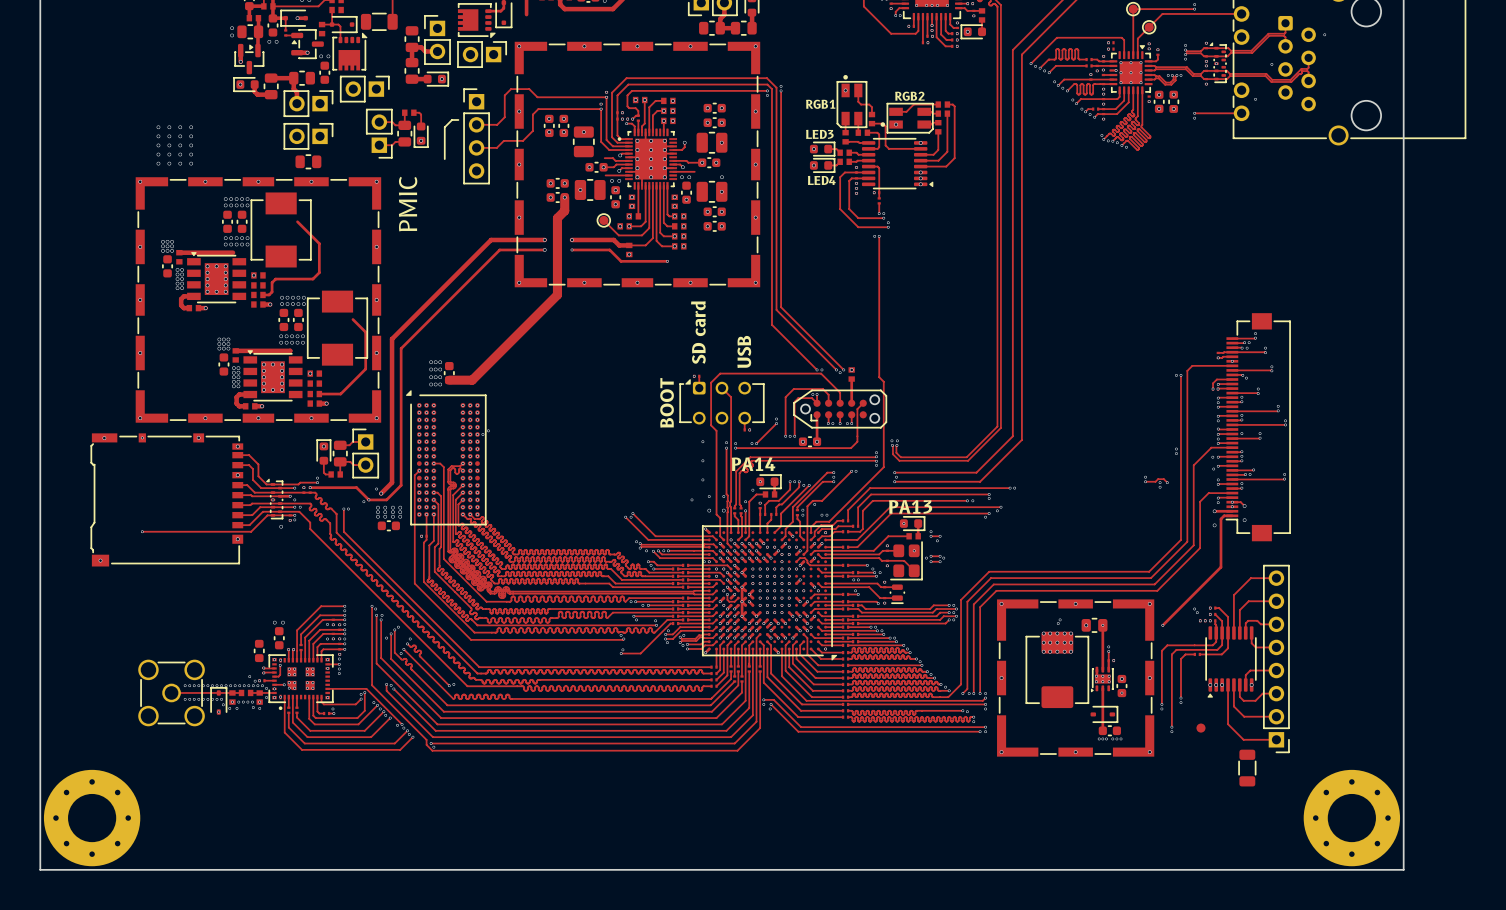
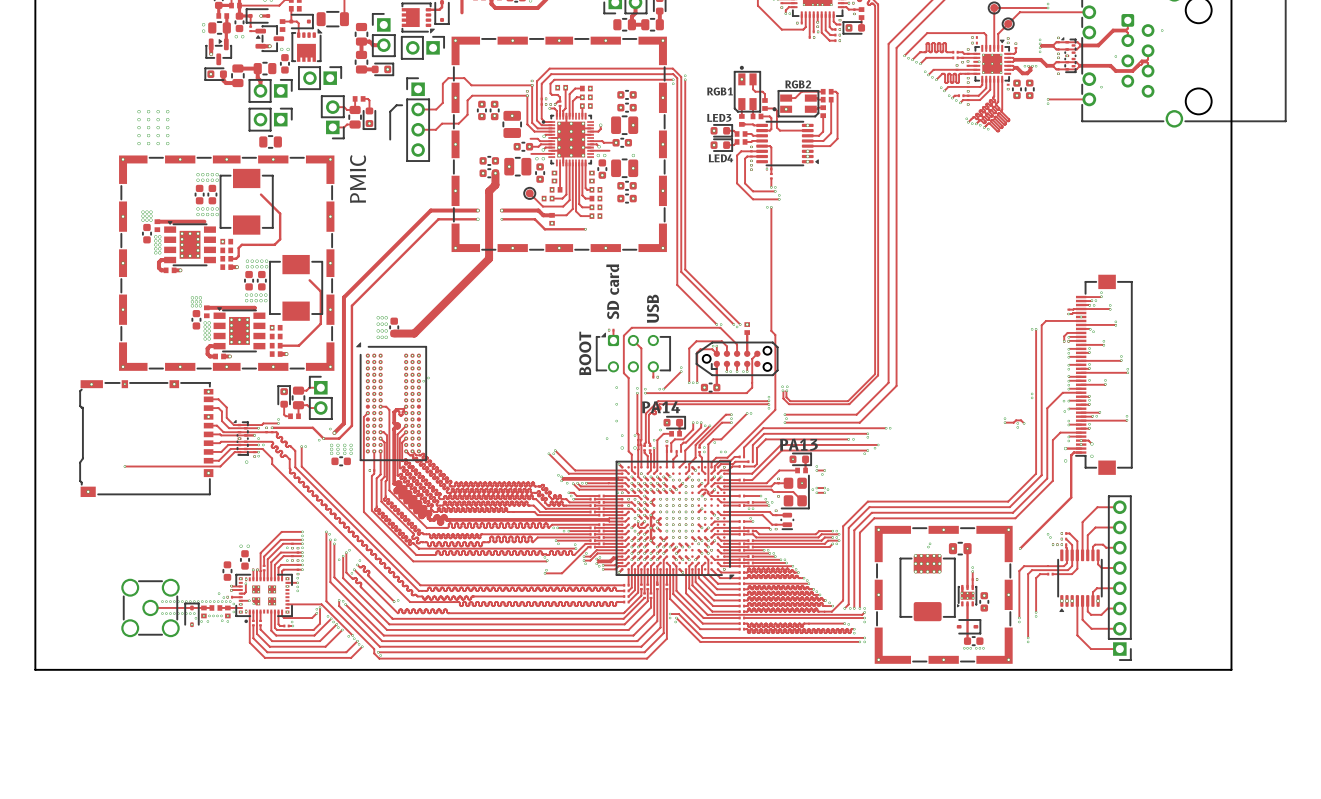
part: (1200, 728) -> none
board edge: (40, 763) (40, 869) (1403, 869) (1403, 763) -> (35, 669) (1231, 669)
part: (1247, 768) -> none
part: (92, 818) -> none
part: (1351, 818) -> none

